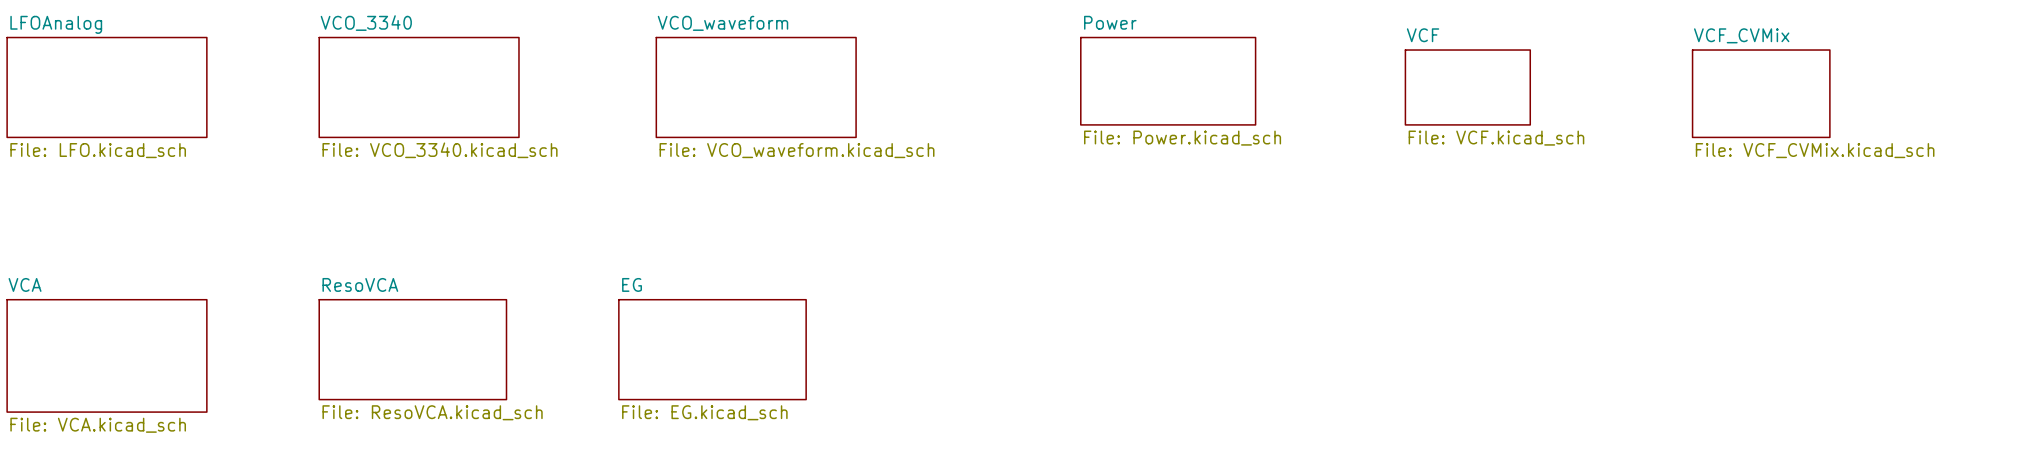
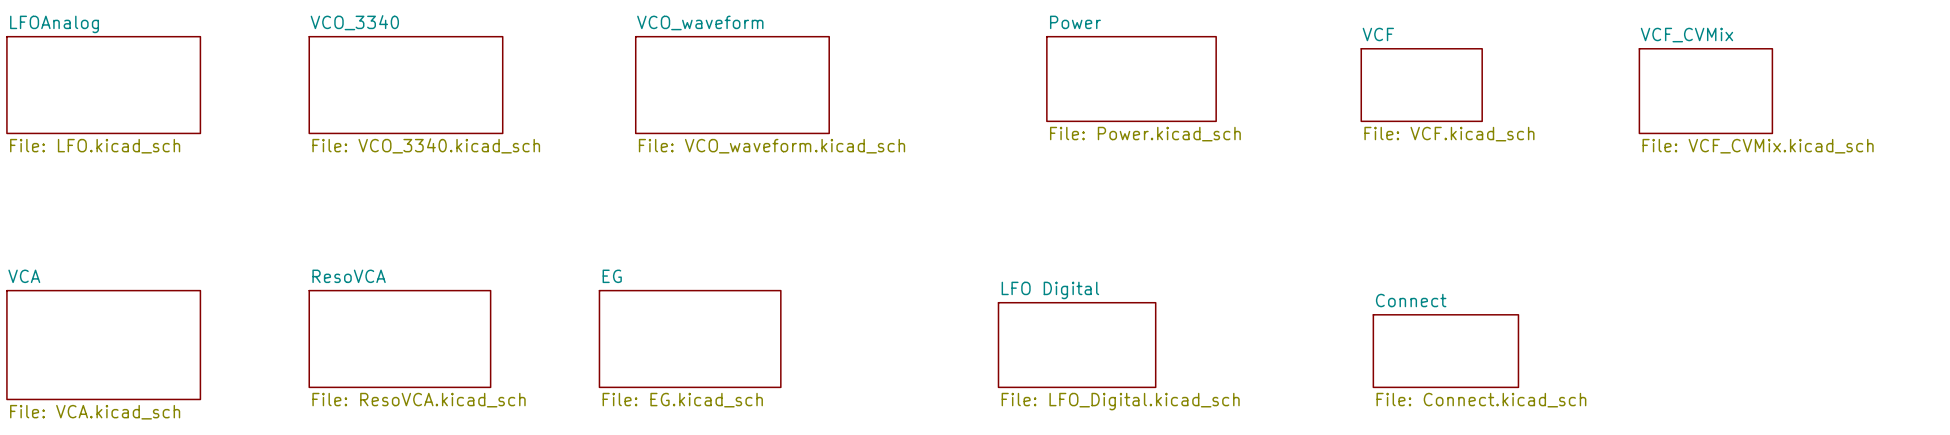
sheet LFO Digital: none -> File: LFO_Digital.kicad_sch (1077, 345)
sheet Connect: none -> File: Connect.kicad_sch (1445, 351)

